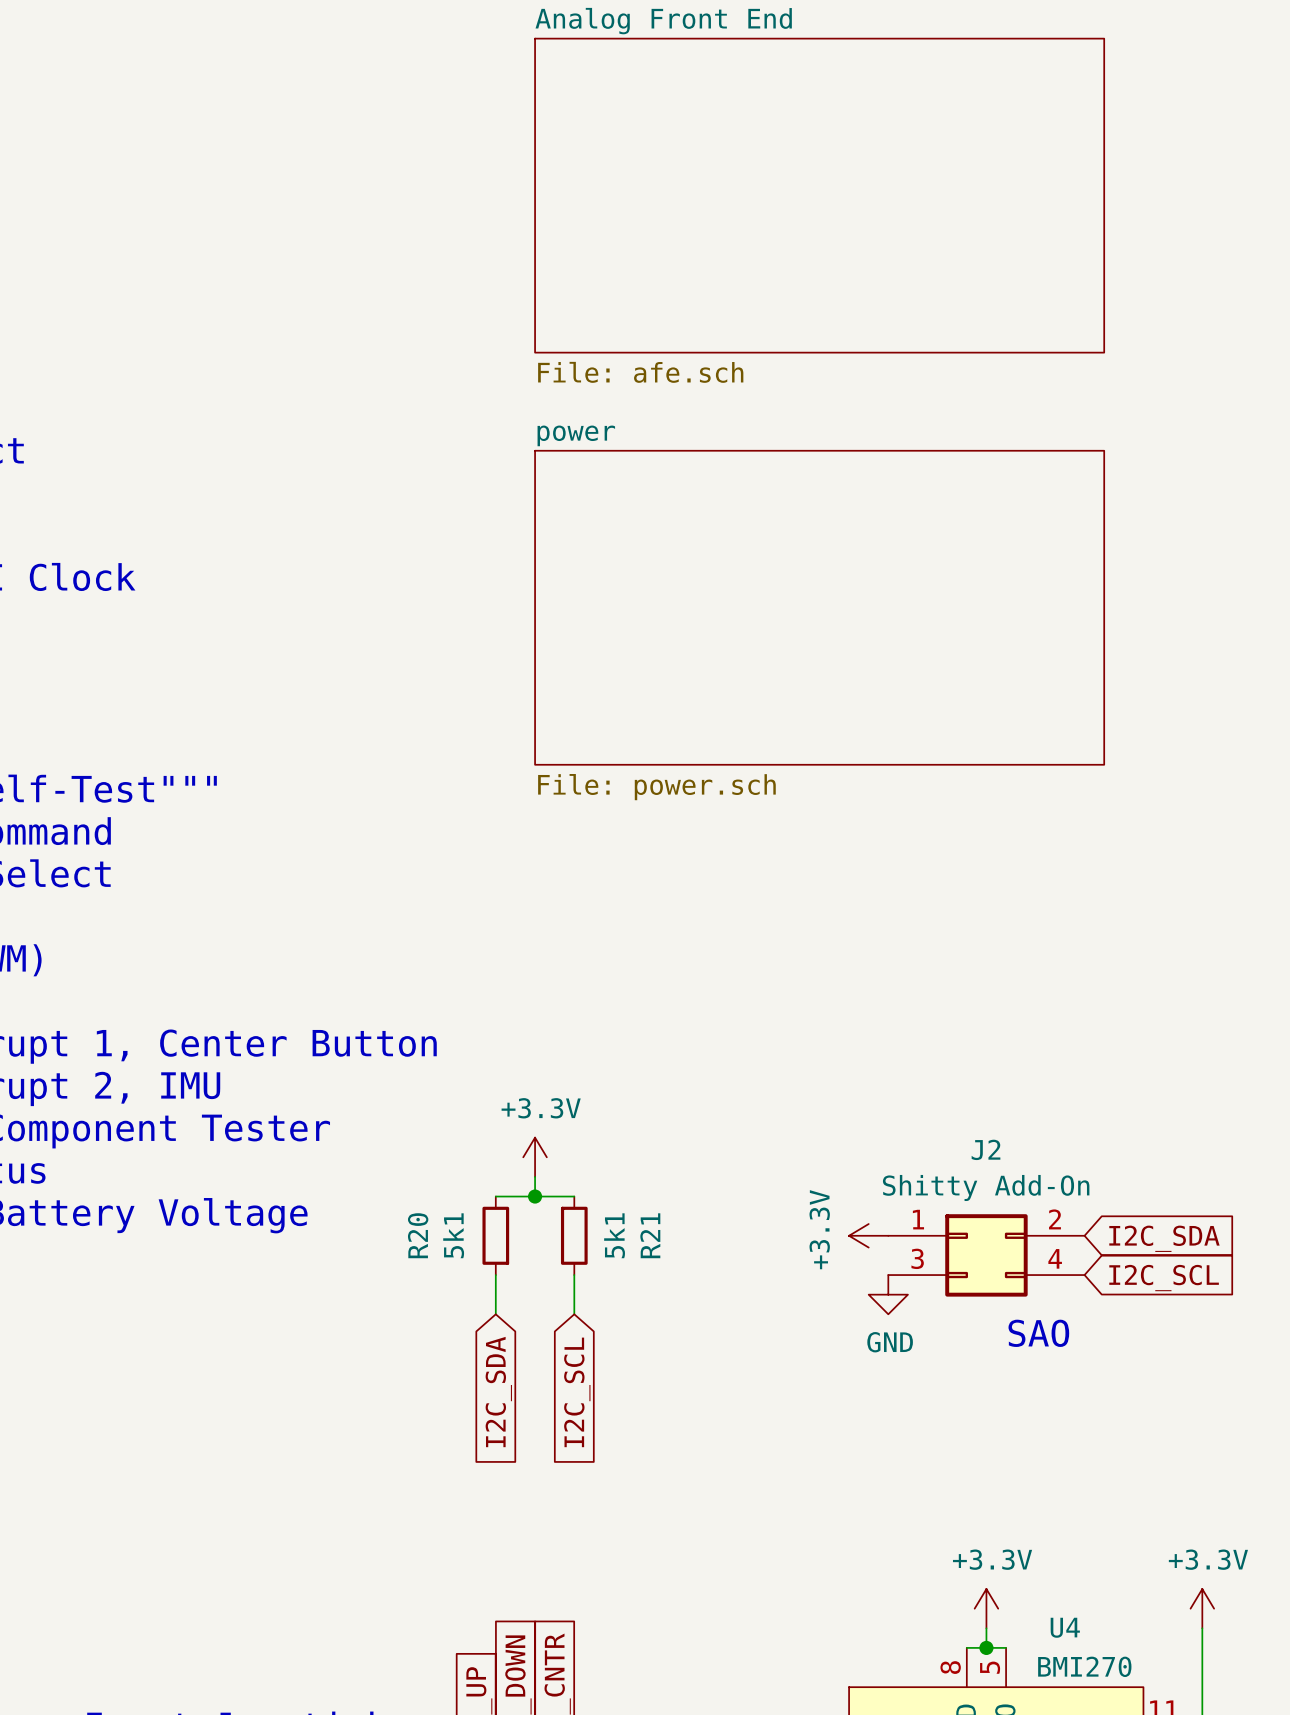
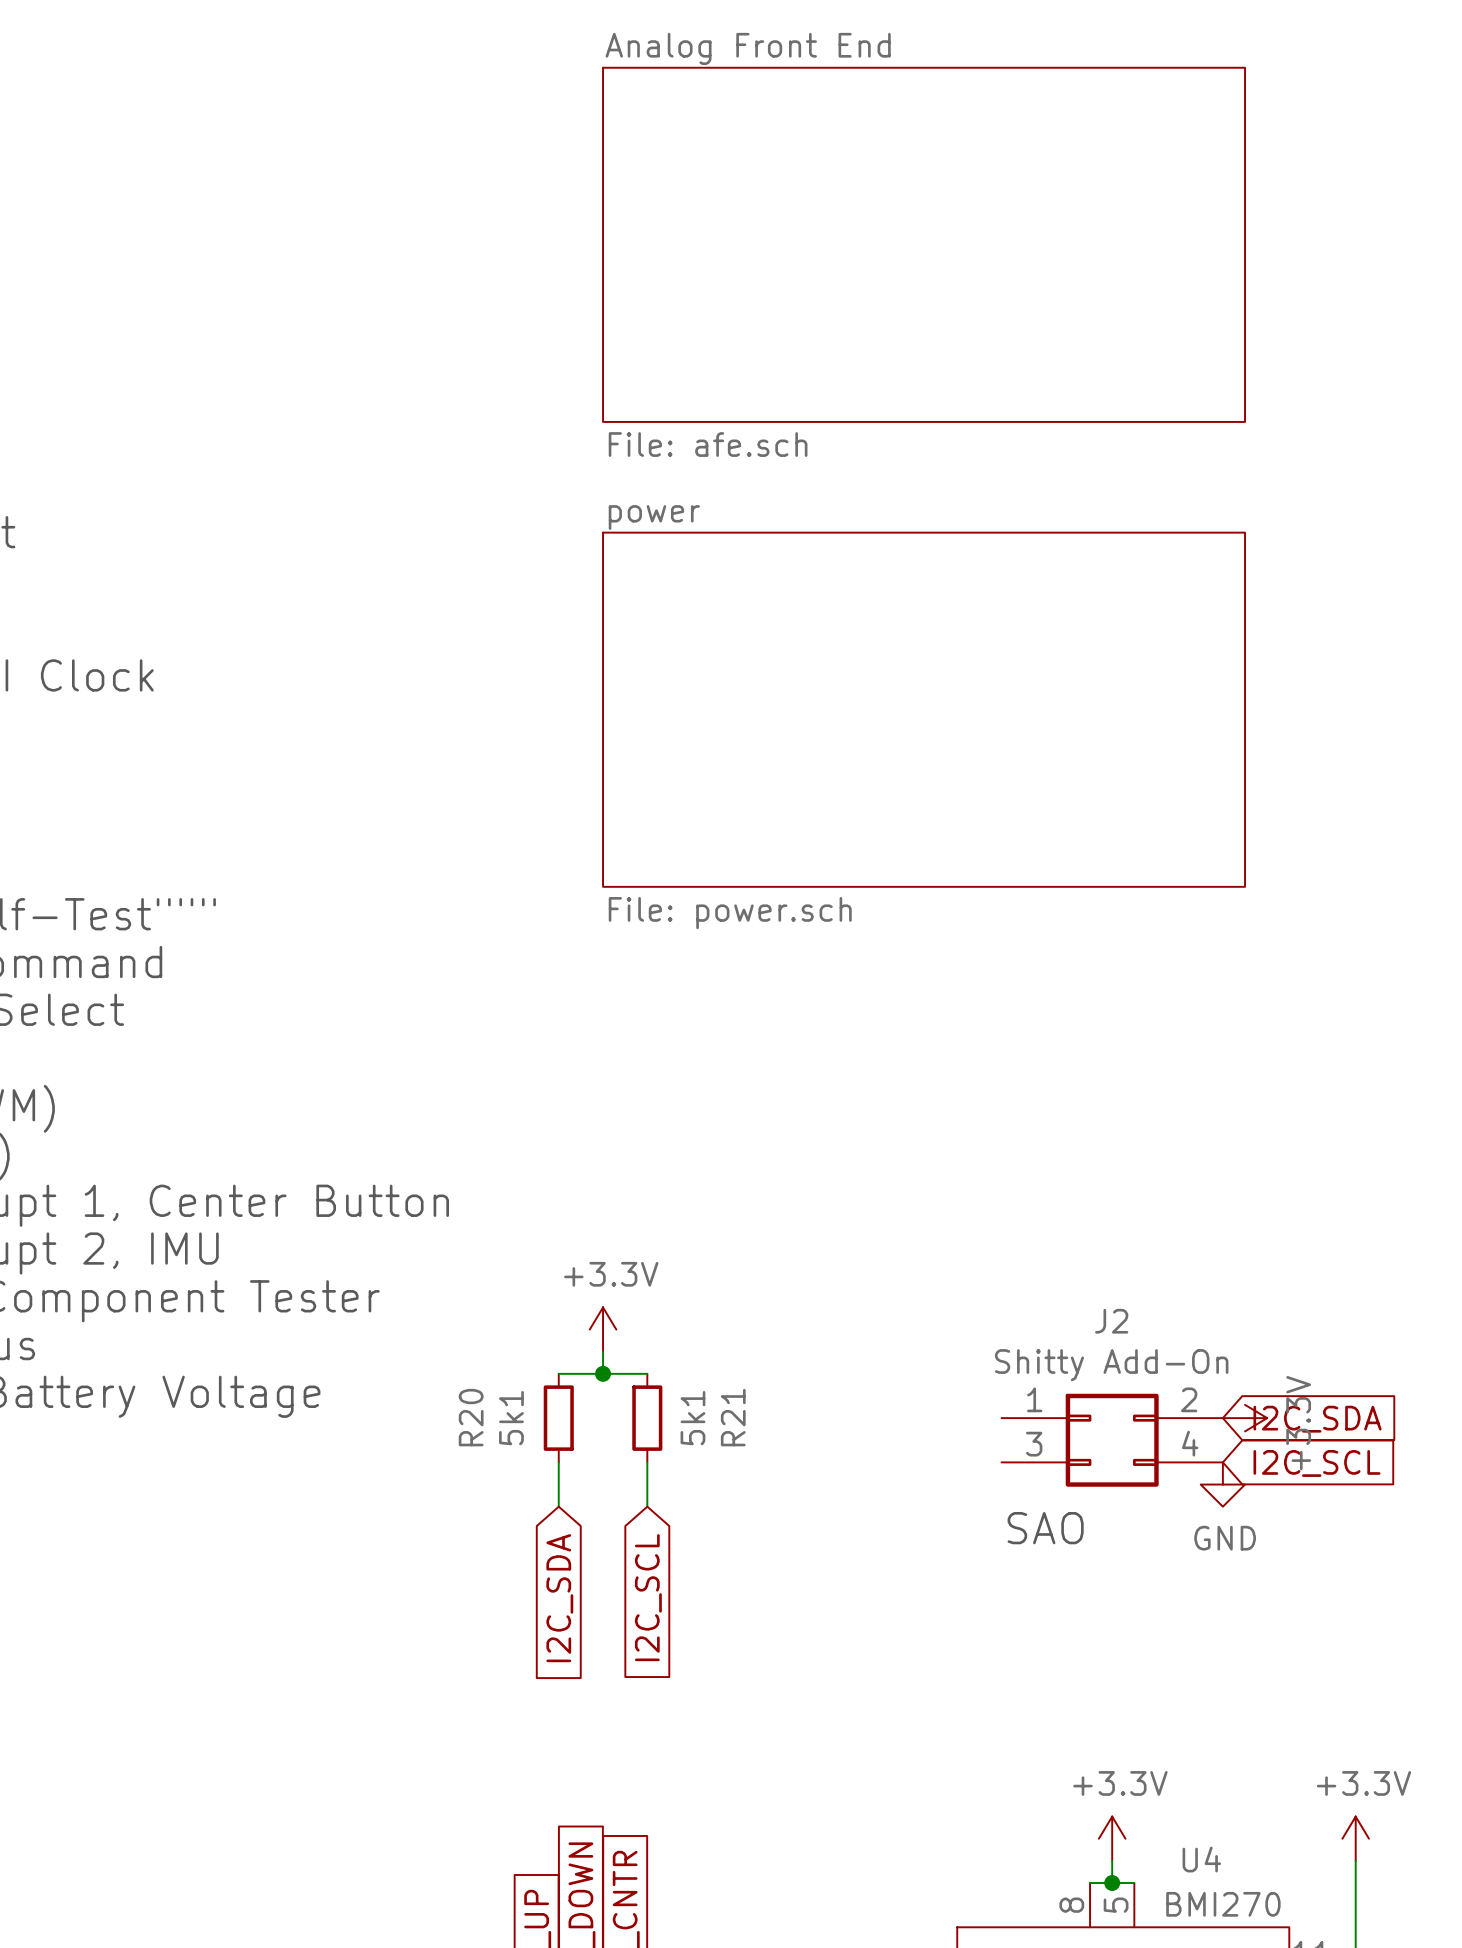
power symbol rotation: 0° (868, 1235) -> 180° (1245, 1418)
power symbol position: +3.3V (868, 1235) -> +3.3V (1245, 1418)
power symbol position: GND (888, 1294) -> GND (1222, 1484)
text position: SAO (1038, 1333) -> SAO (1045, 1528)

